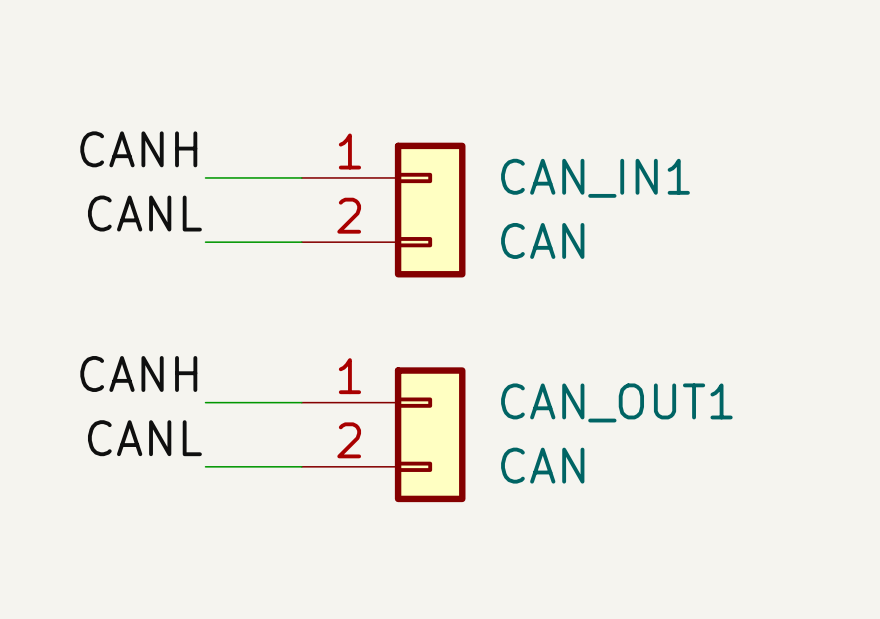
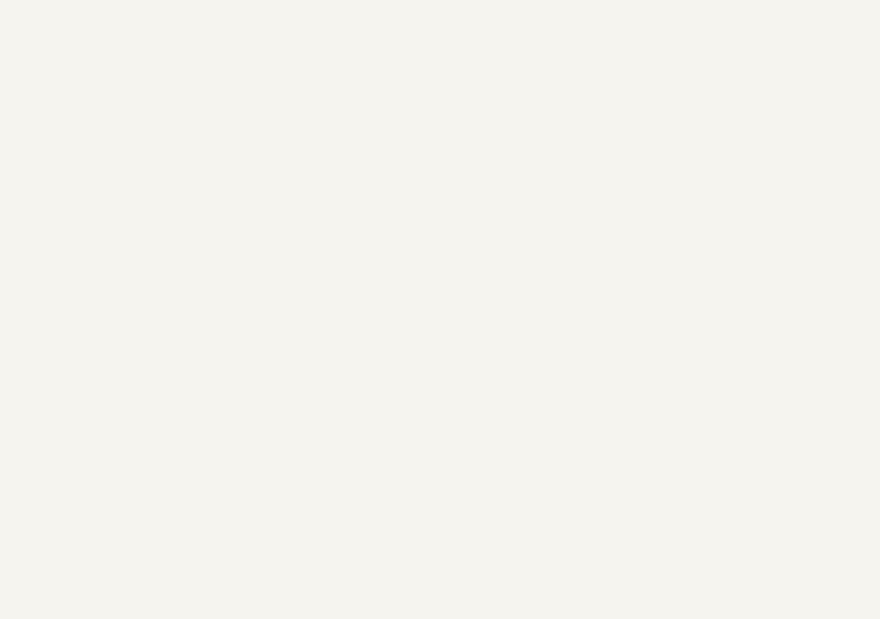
label: CANH (138, 149) -> none
wire: (205, 177) (301, 177) -> none
CAN_IN1: CAN (383, 210) -> none
label: CANL (144, 213) -> none
wire: (205, 242) (301, 242) -> none
label: CANH (138, 373) -> none
wire: (205, 402) (301, 402) -> none
CAN_OUT1: CAN (383, 434) -> none
label: CANL (144, 438) -> none
wire: (205, 466) (301, 466) -> none

